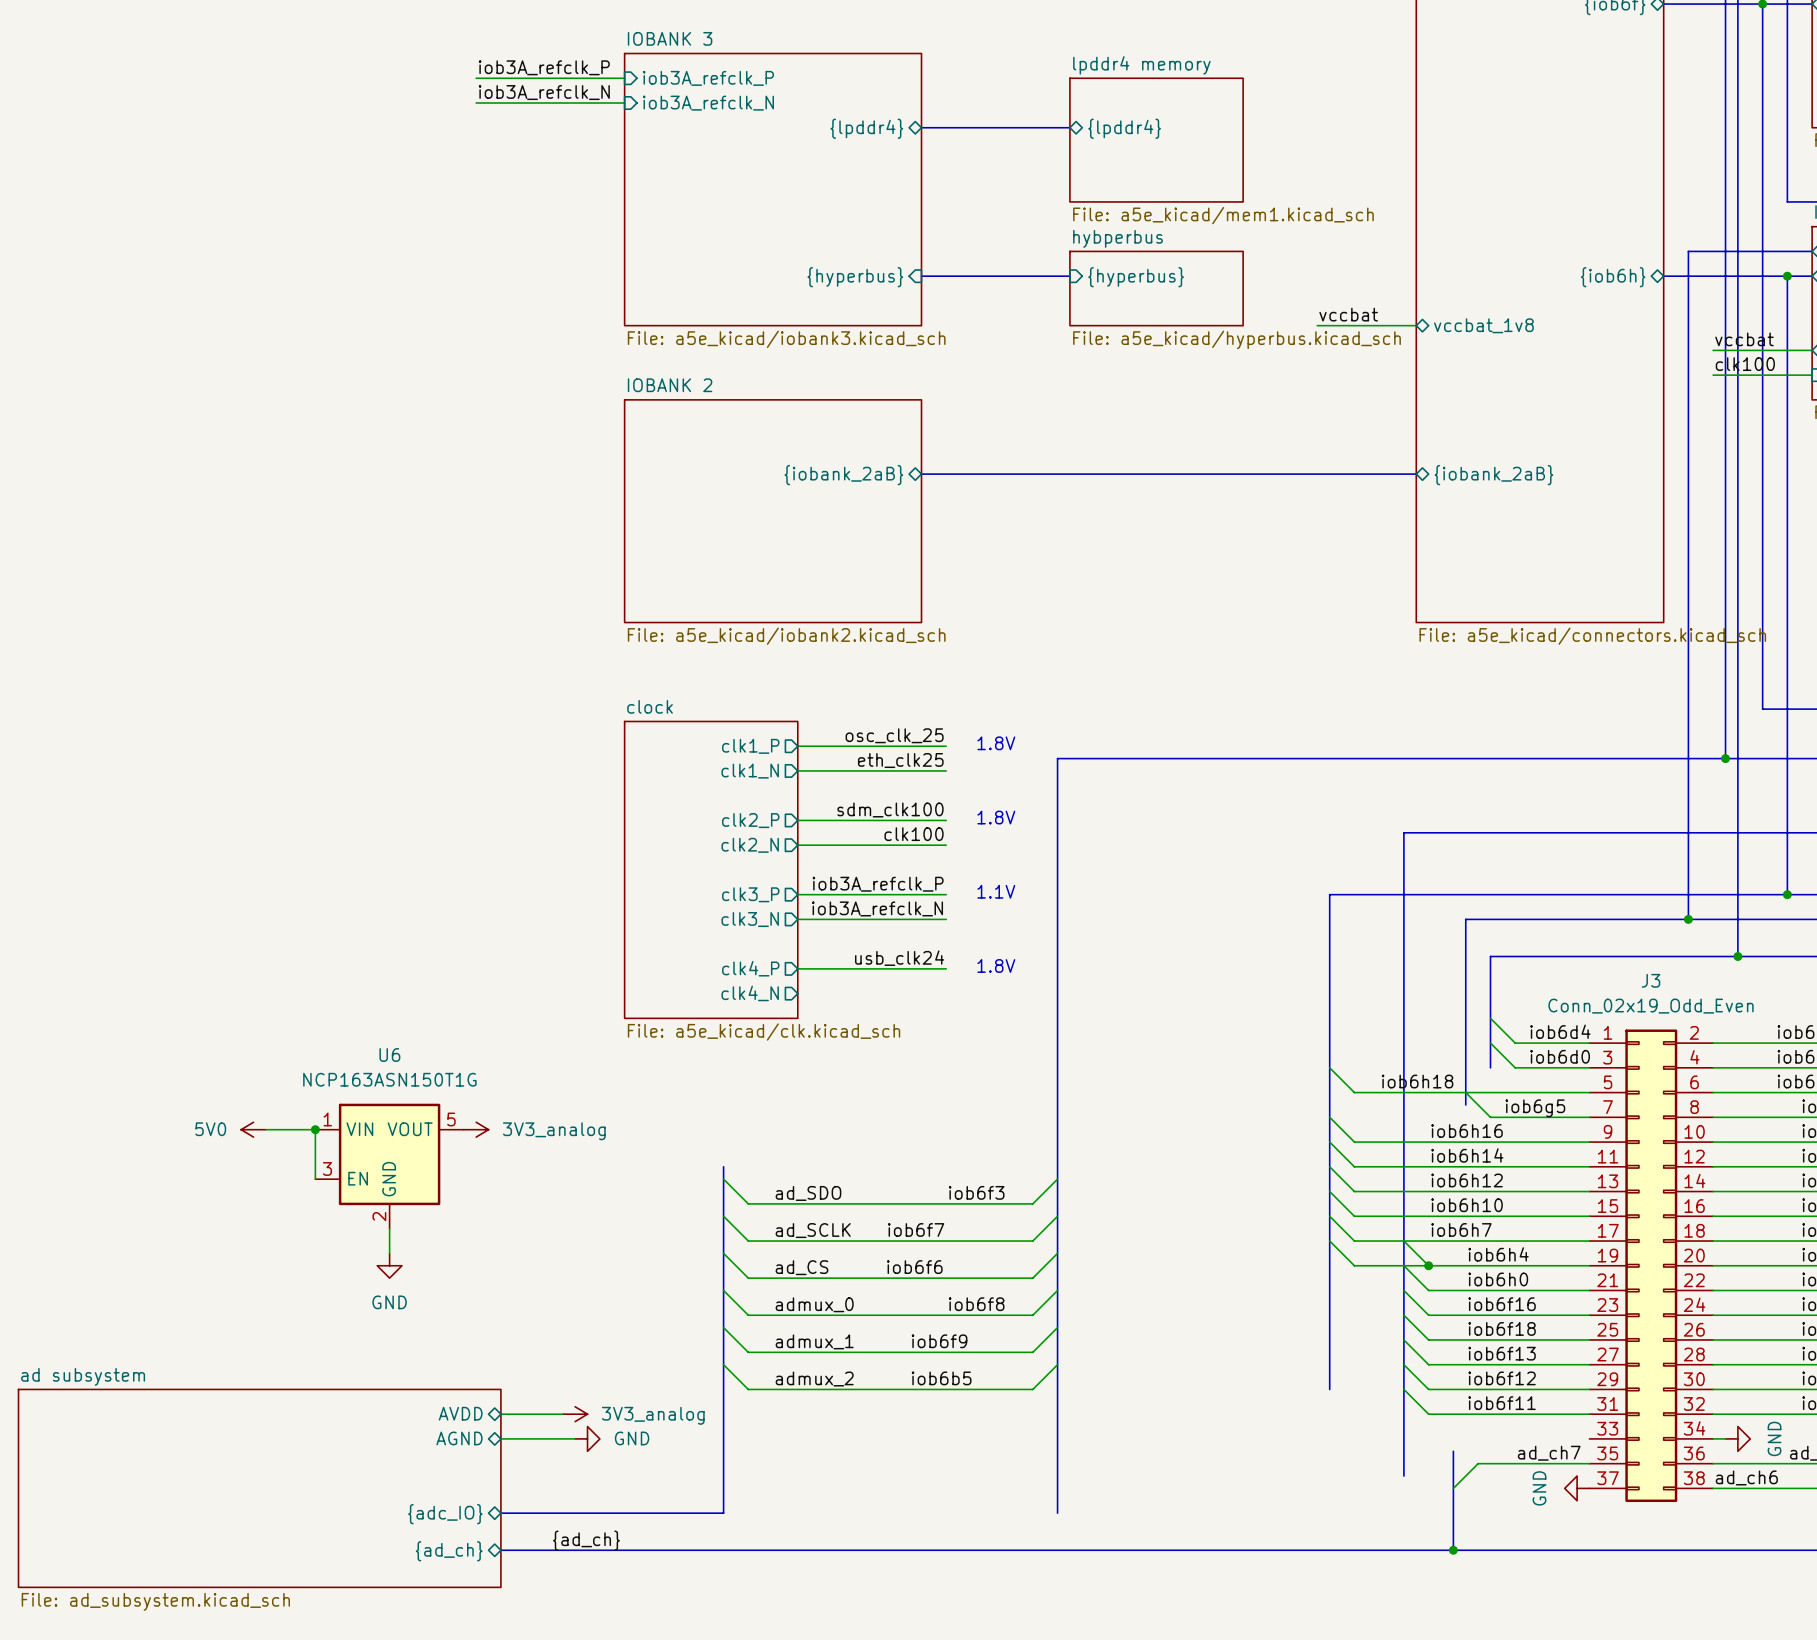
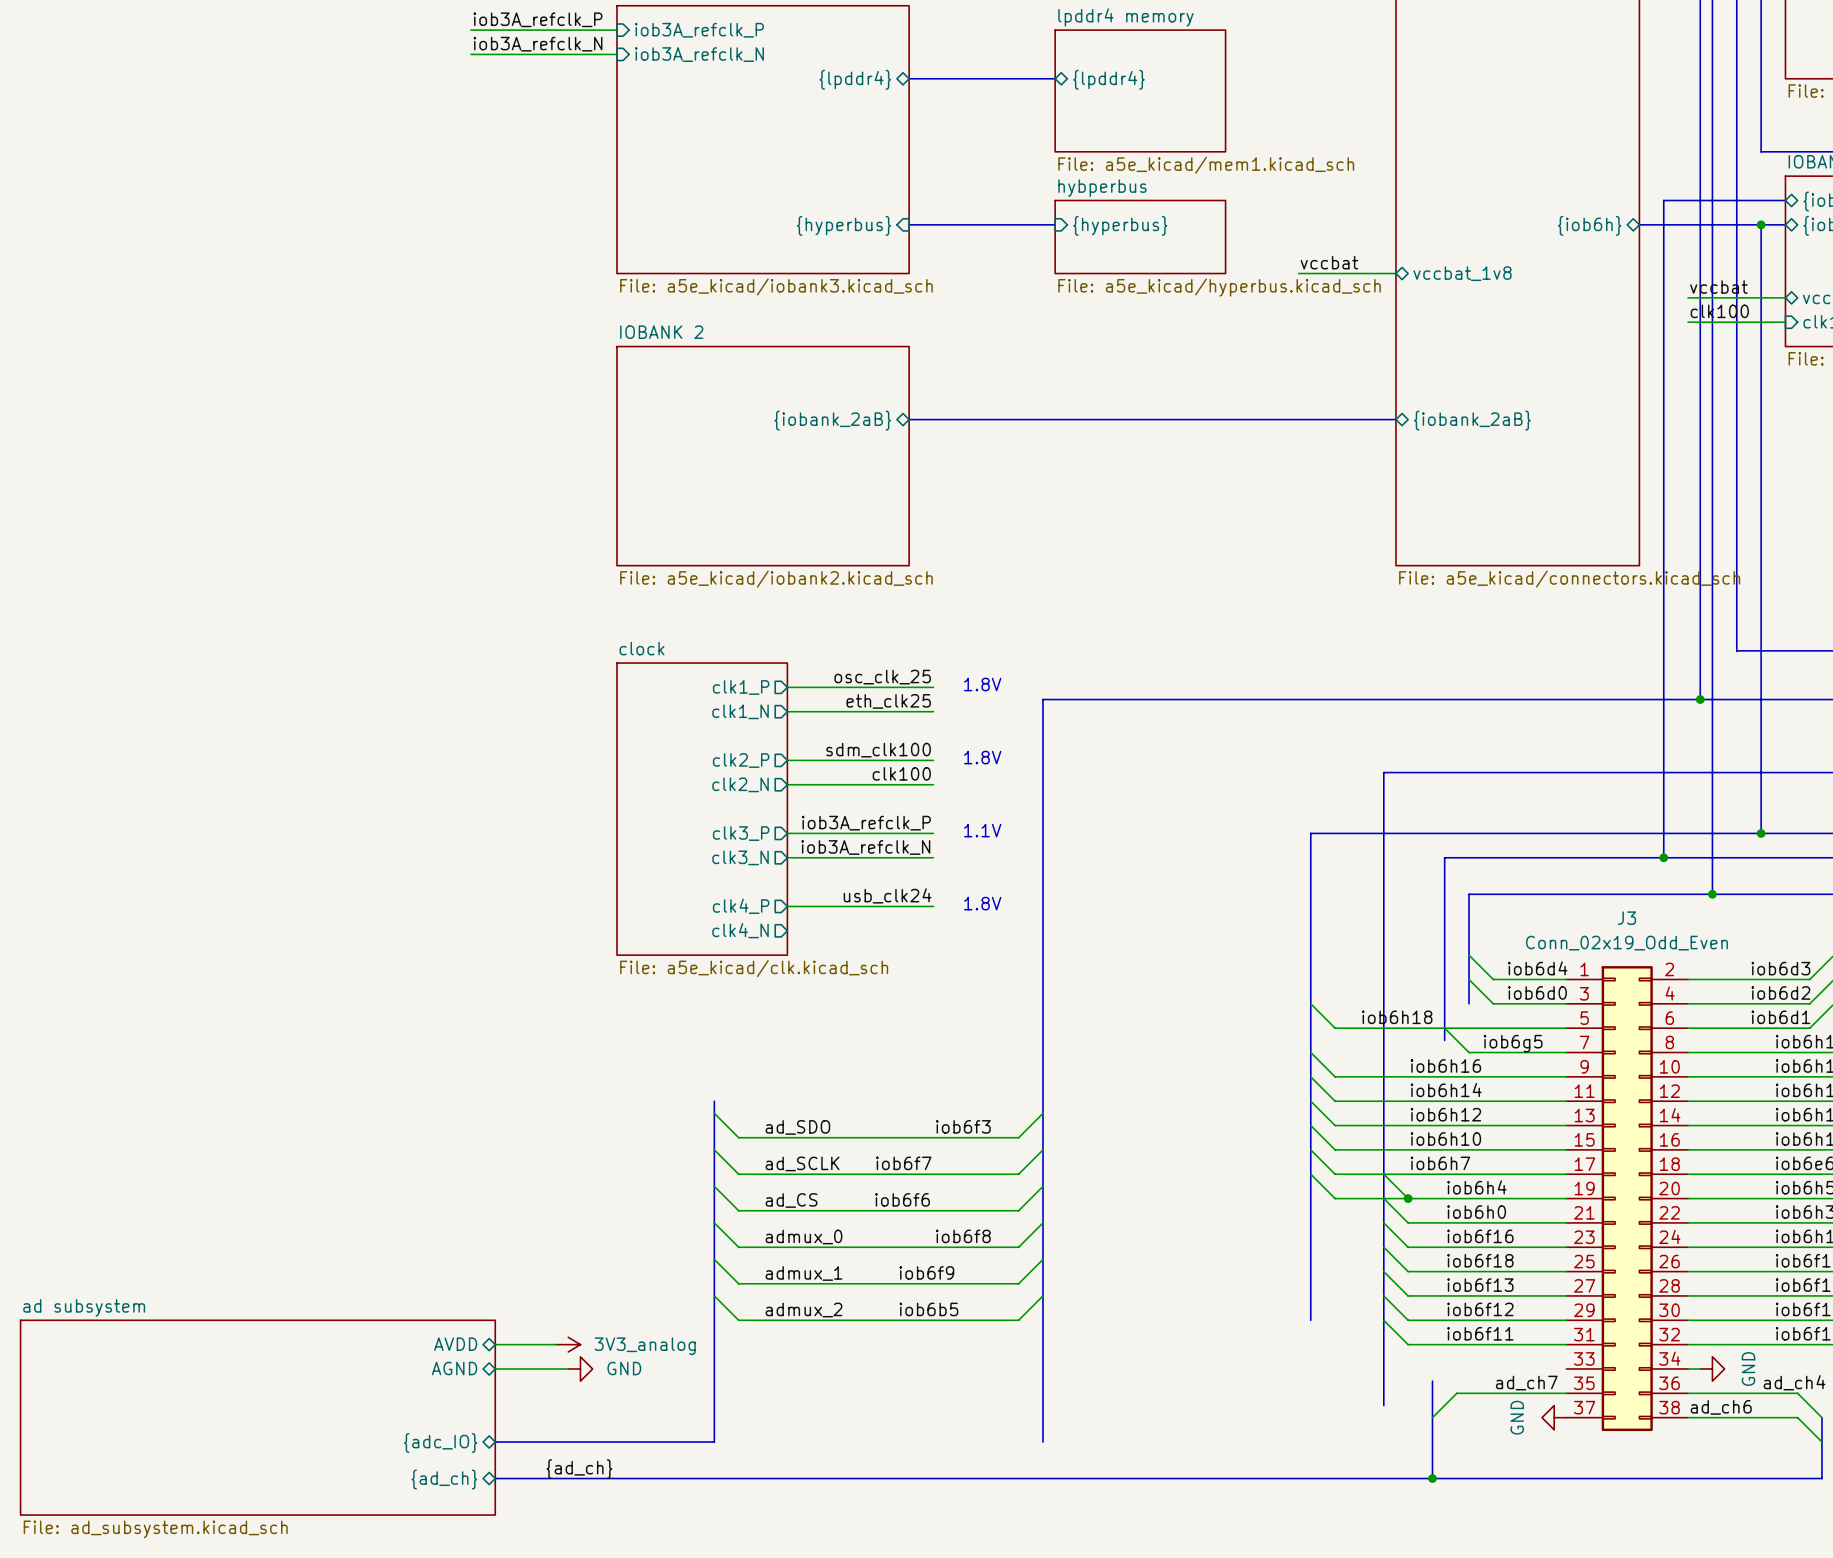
power symbol: 5V0 (253, 1129) -> none
wire: (265, 1129) (315, 1129) (315, 1179) -> none
junction: (315, 1129) -> none
power symbol: 3V3_analog (476, 1129) -> none
U6: NCP163ASN150T1G (389, 1166) -> none
wire: (389, 1228) (389, 1253) -> none
power symbol: GND (389, 1265) -> none

